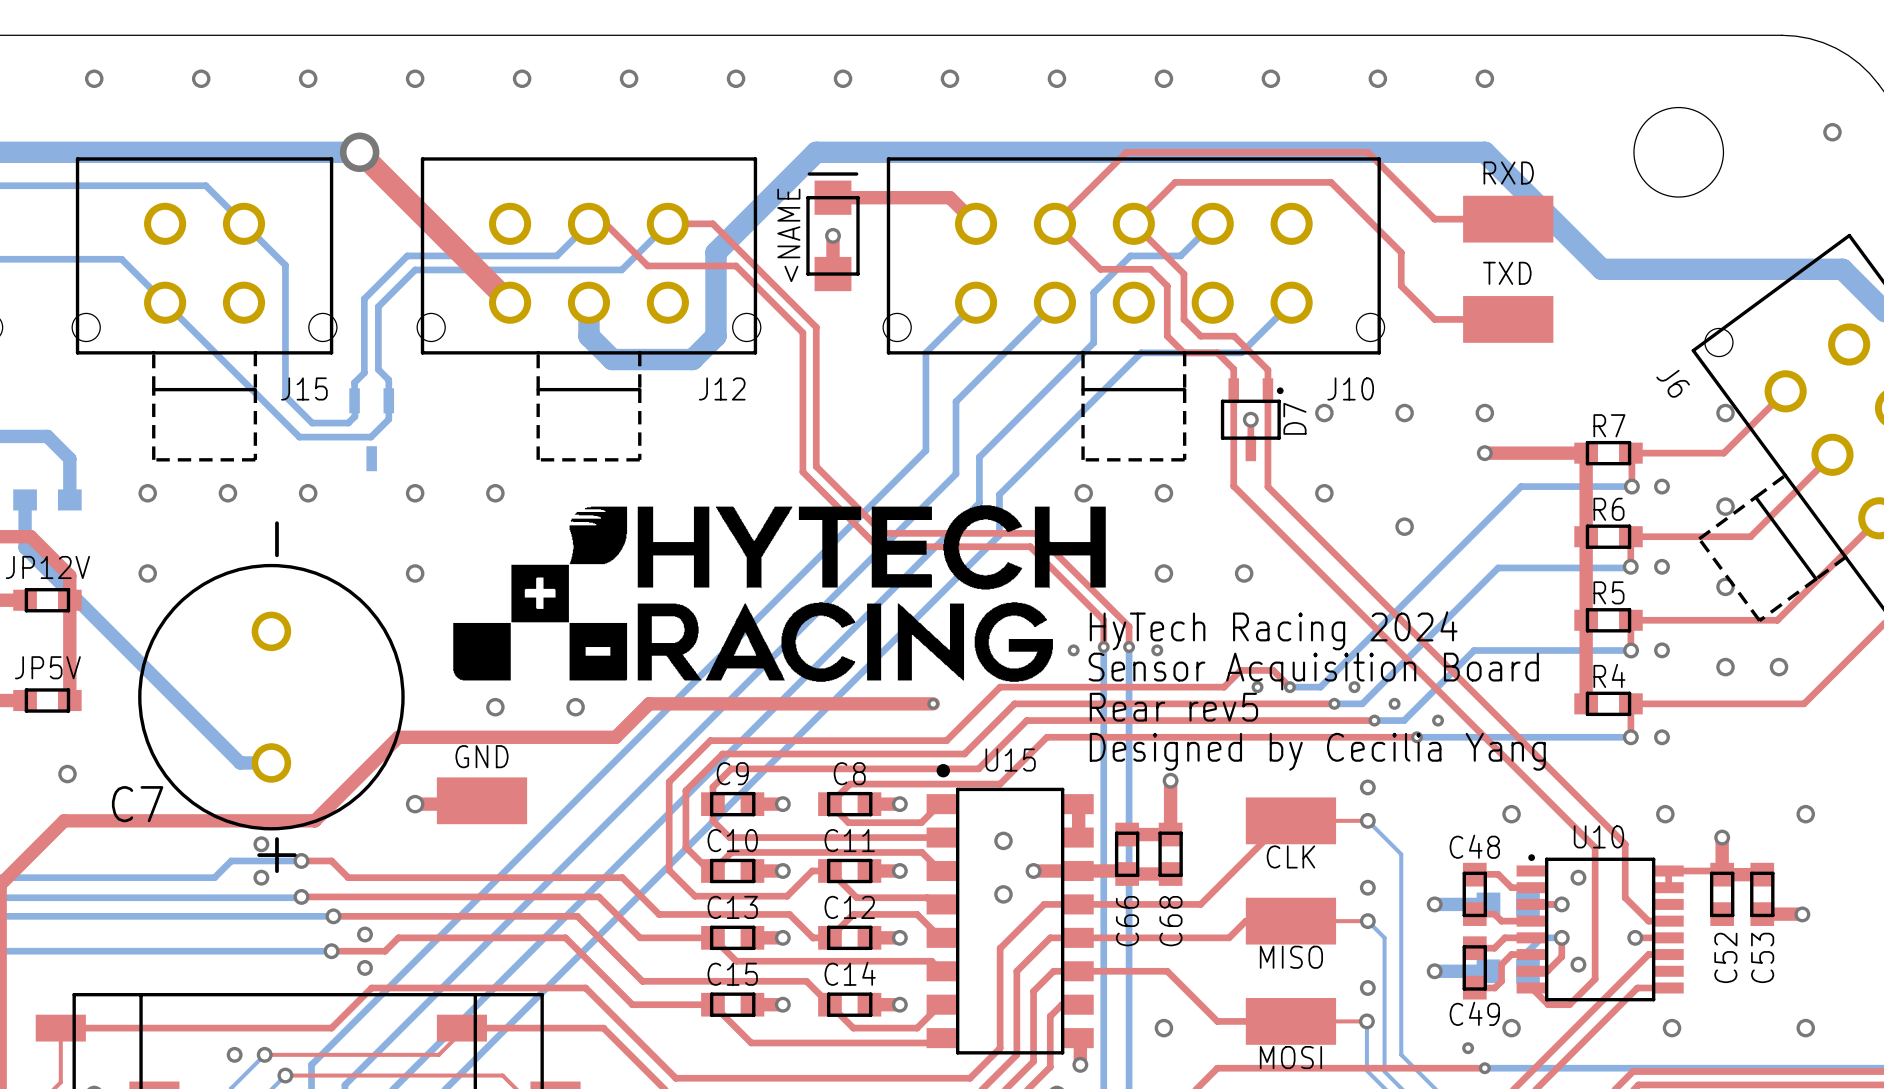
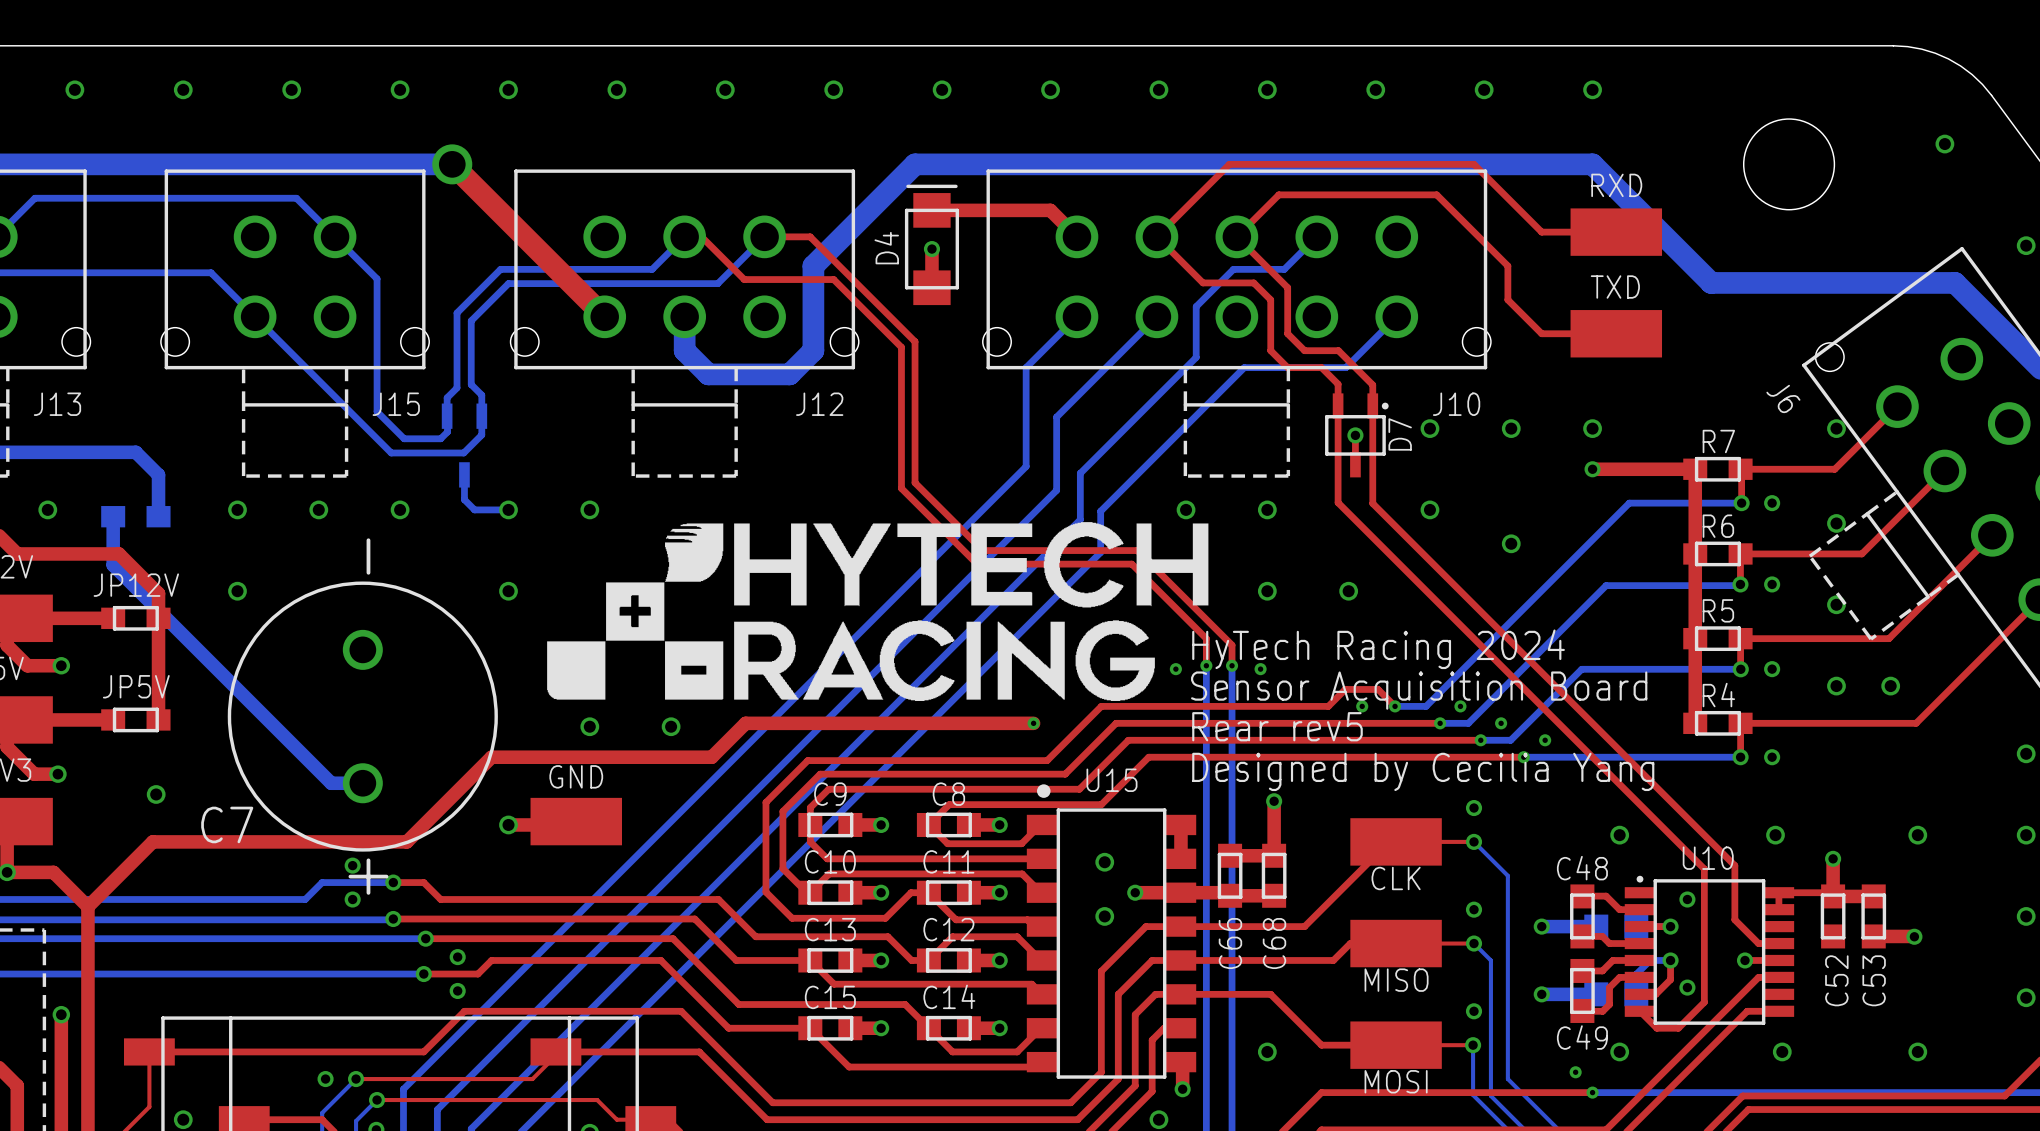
D4 name: none -> D4 (886, 248)
D4 text: <NAME (788, 235) -> none
bottom track: none -> (464, 474) (464, 499) (474, 509) (508, 509)

